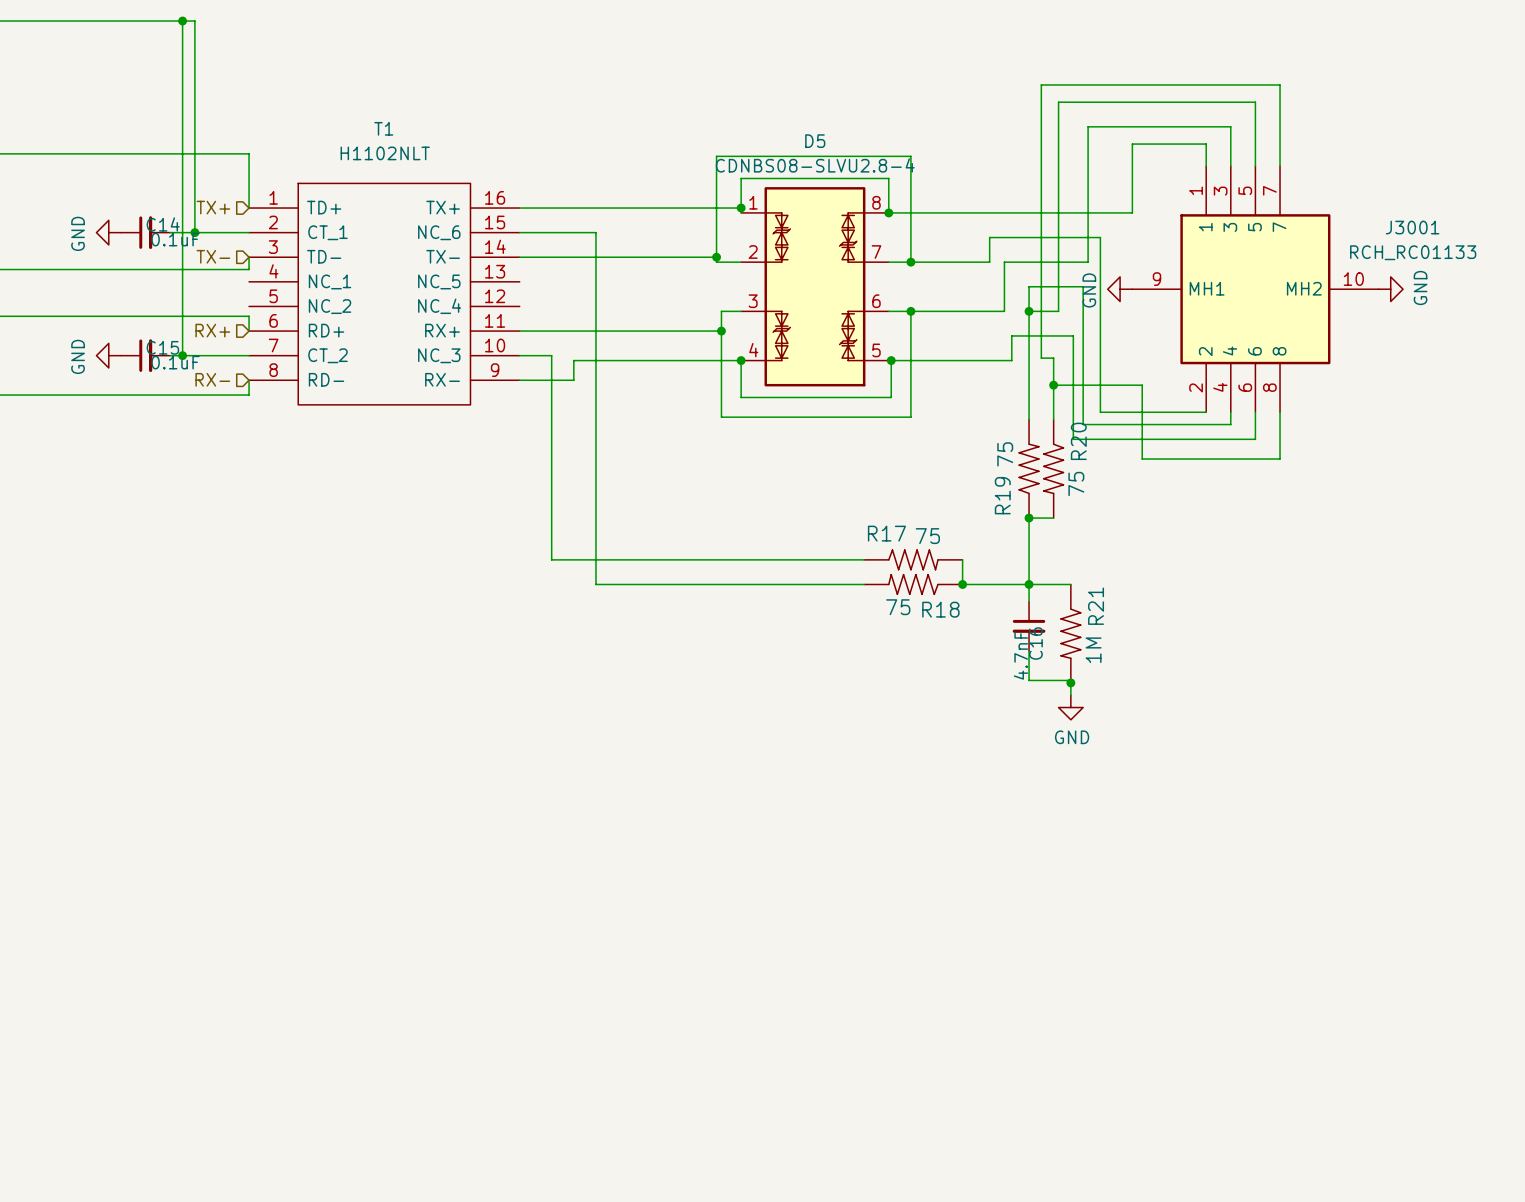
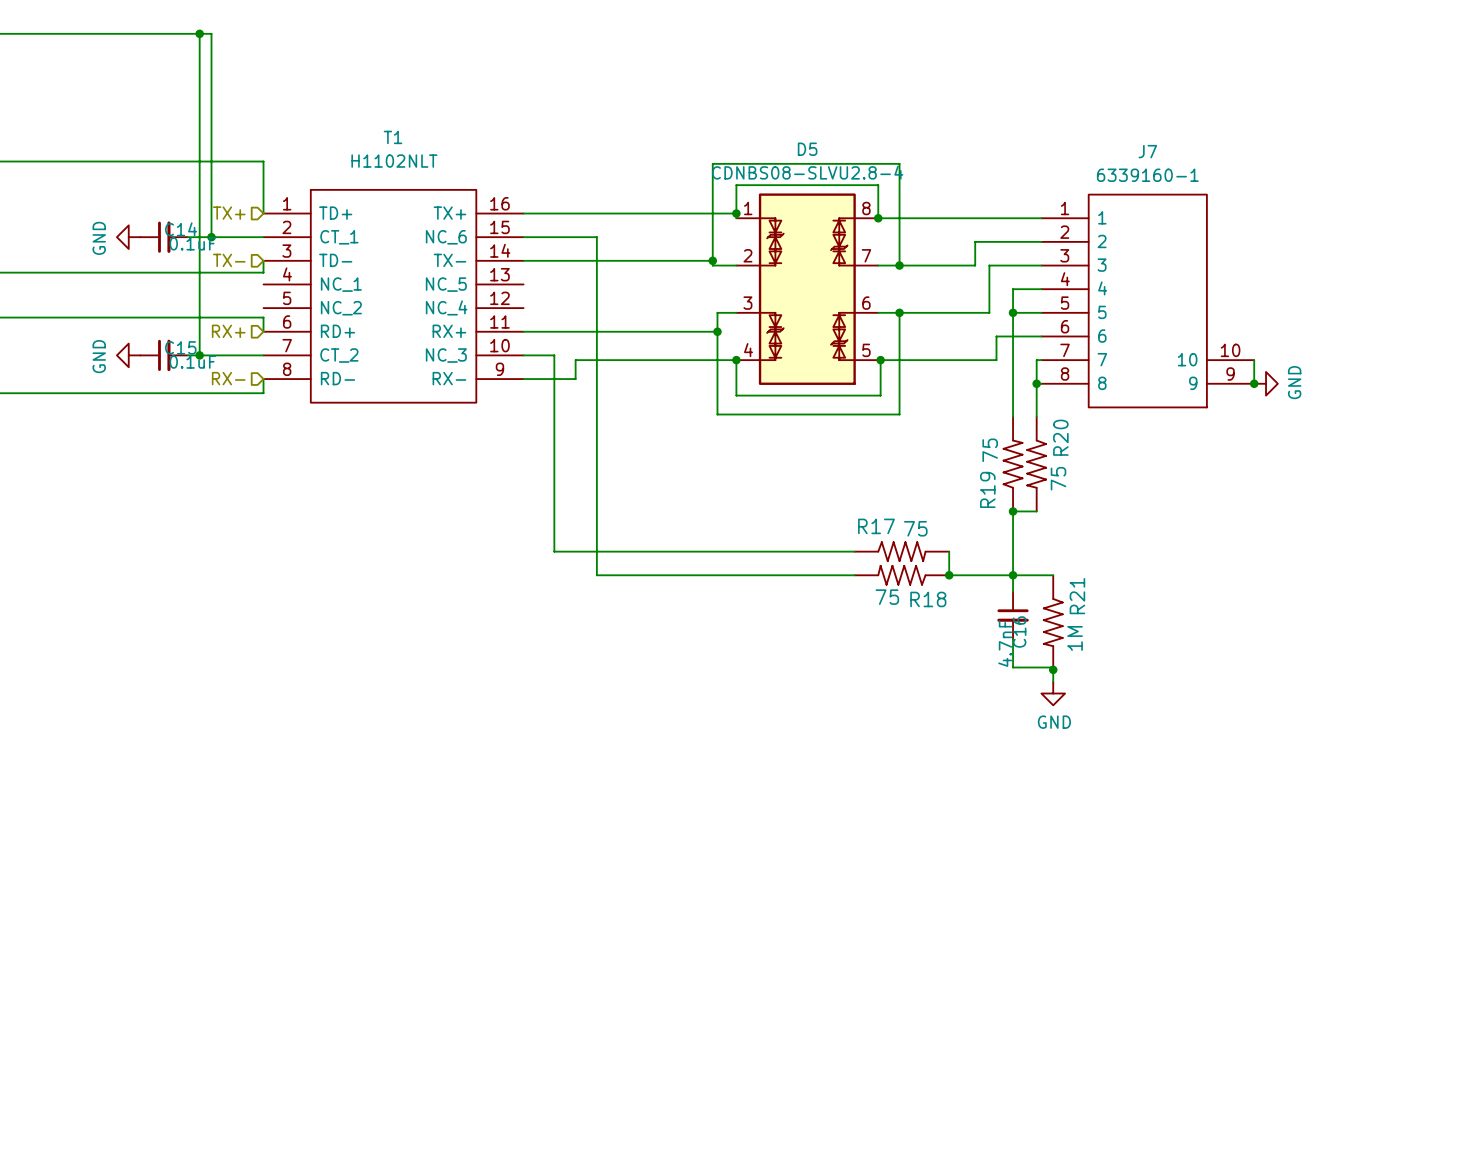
wire: (1206, 166) (1206, 144) (1132, 144) (1132, 212) (1058, 212) -> none
wire: (1230, 166) (1230, 126) (1088, 126) (1088, 262) (1058, 262) -> none
wire: (1255, 166) (1255, 102) (1058, 102) (1058, 311) -> none
wire: (1280, 166) (1280, 84) (1041, 84) (1041, 358) (1053, 358) (1053, 360) -> (1041, 360) (1036, 360)
wire: (1058, 237) (1100, 237) (1100, 412) (1206, 412) -> none
wire: (1058, 286) (1083, 286) (1083, 424) (1230, 424) (1230, 412) -> none
power symbol: GND (1120, 289) -> none
J3001: RCH_RC01133 (1255, 289) -> none
power symbol: GND (1390, 289) -> none
J7: none -> 6339160-1 (1147, 301)
wire: (1058, 335) (1073, 335) (1073, 439) (1255, 439) (1255, 412) -> none
wire: (1058, 385) (1142, 385) (1142, 459) (1280, 459) (1280, 412) -> none
junction: none -> (1254, 383)
power symbol: none -> GND (1266, 383)

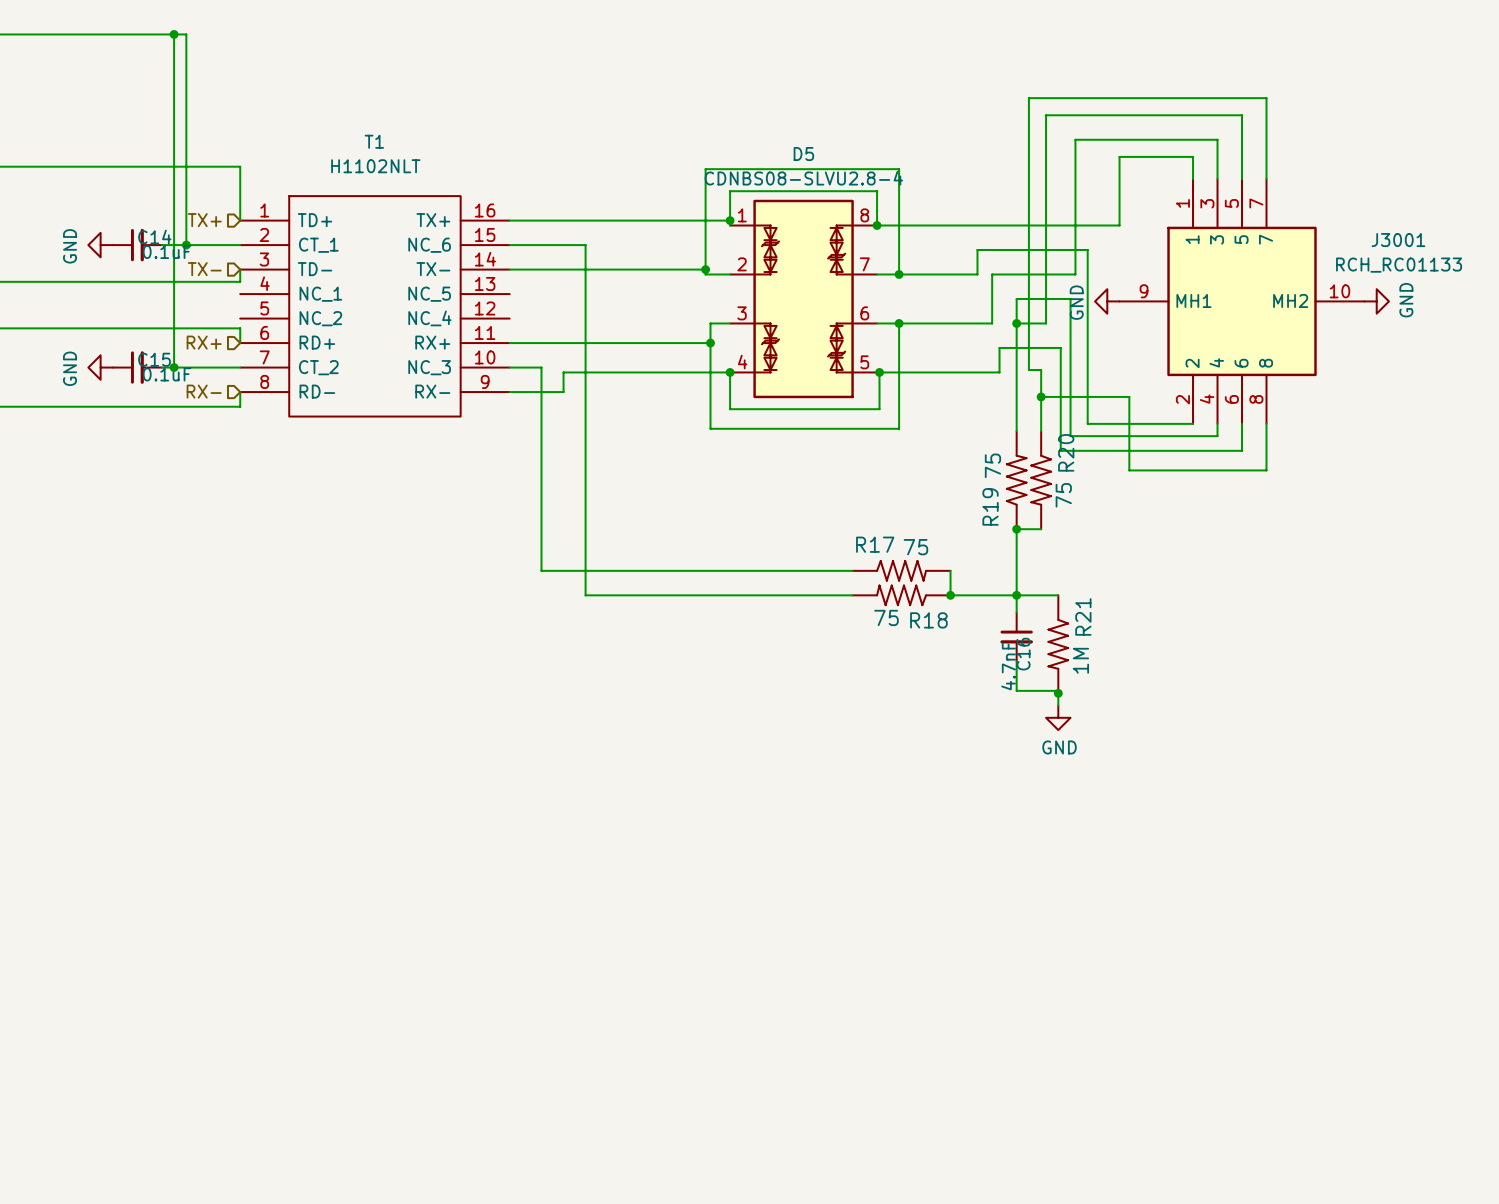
wire: none -> (1193, 178) (1193, 156) (1119, 156) (1119, 225) (1046, 225)
wire: none -> (1217, 178) (1217, 139) (1075, 139) (1075, 274) (1046, 274)
wire: none -> (1242, 178) (1242, 115) (1046, 115) (1046, 323)
wire: none -> (1046, 249) (1087, 249) (1087, 423) (1193, 423)
wire: none -> (1046, 298) (1070, 298) (1070, 436) (1217, 436) (1217, 423)
power symbol: none -> GND (1107, 301)
J3001: none -> RCH_RC01133 (1242, 301)
power symbol: none -> GND (1376, 301)
J7: 6339160-1 (1147, 301) -> none
wire: none -> (1046, 347) (1060, 347) (1060, 450) (1242, 450) (1242, 423)
wire: (1036, 360) (1041, 360) -> (1041, 372) (1041, 370) (1028, 370) (1028, 98) (1266, 98) (1266, 178)
wire: none -> (1046, 396) (1129, 396) (1129, 470) (1266, 470) (1266, 423)
junction: (1254, 383) -> none
power symbol: GND (1266, 383) -> none

